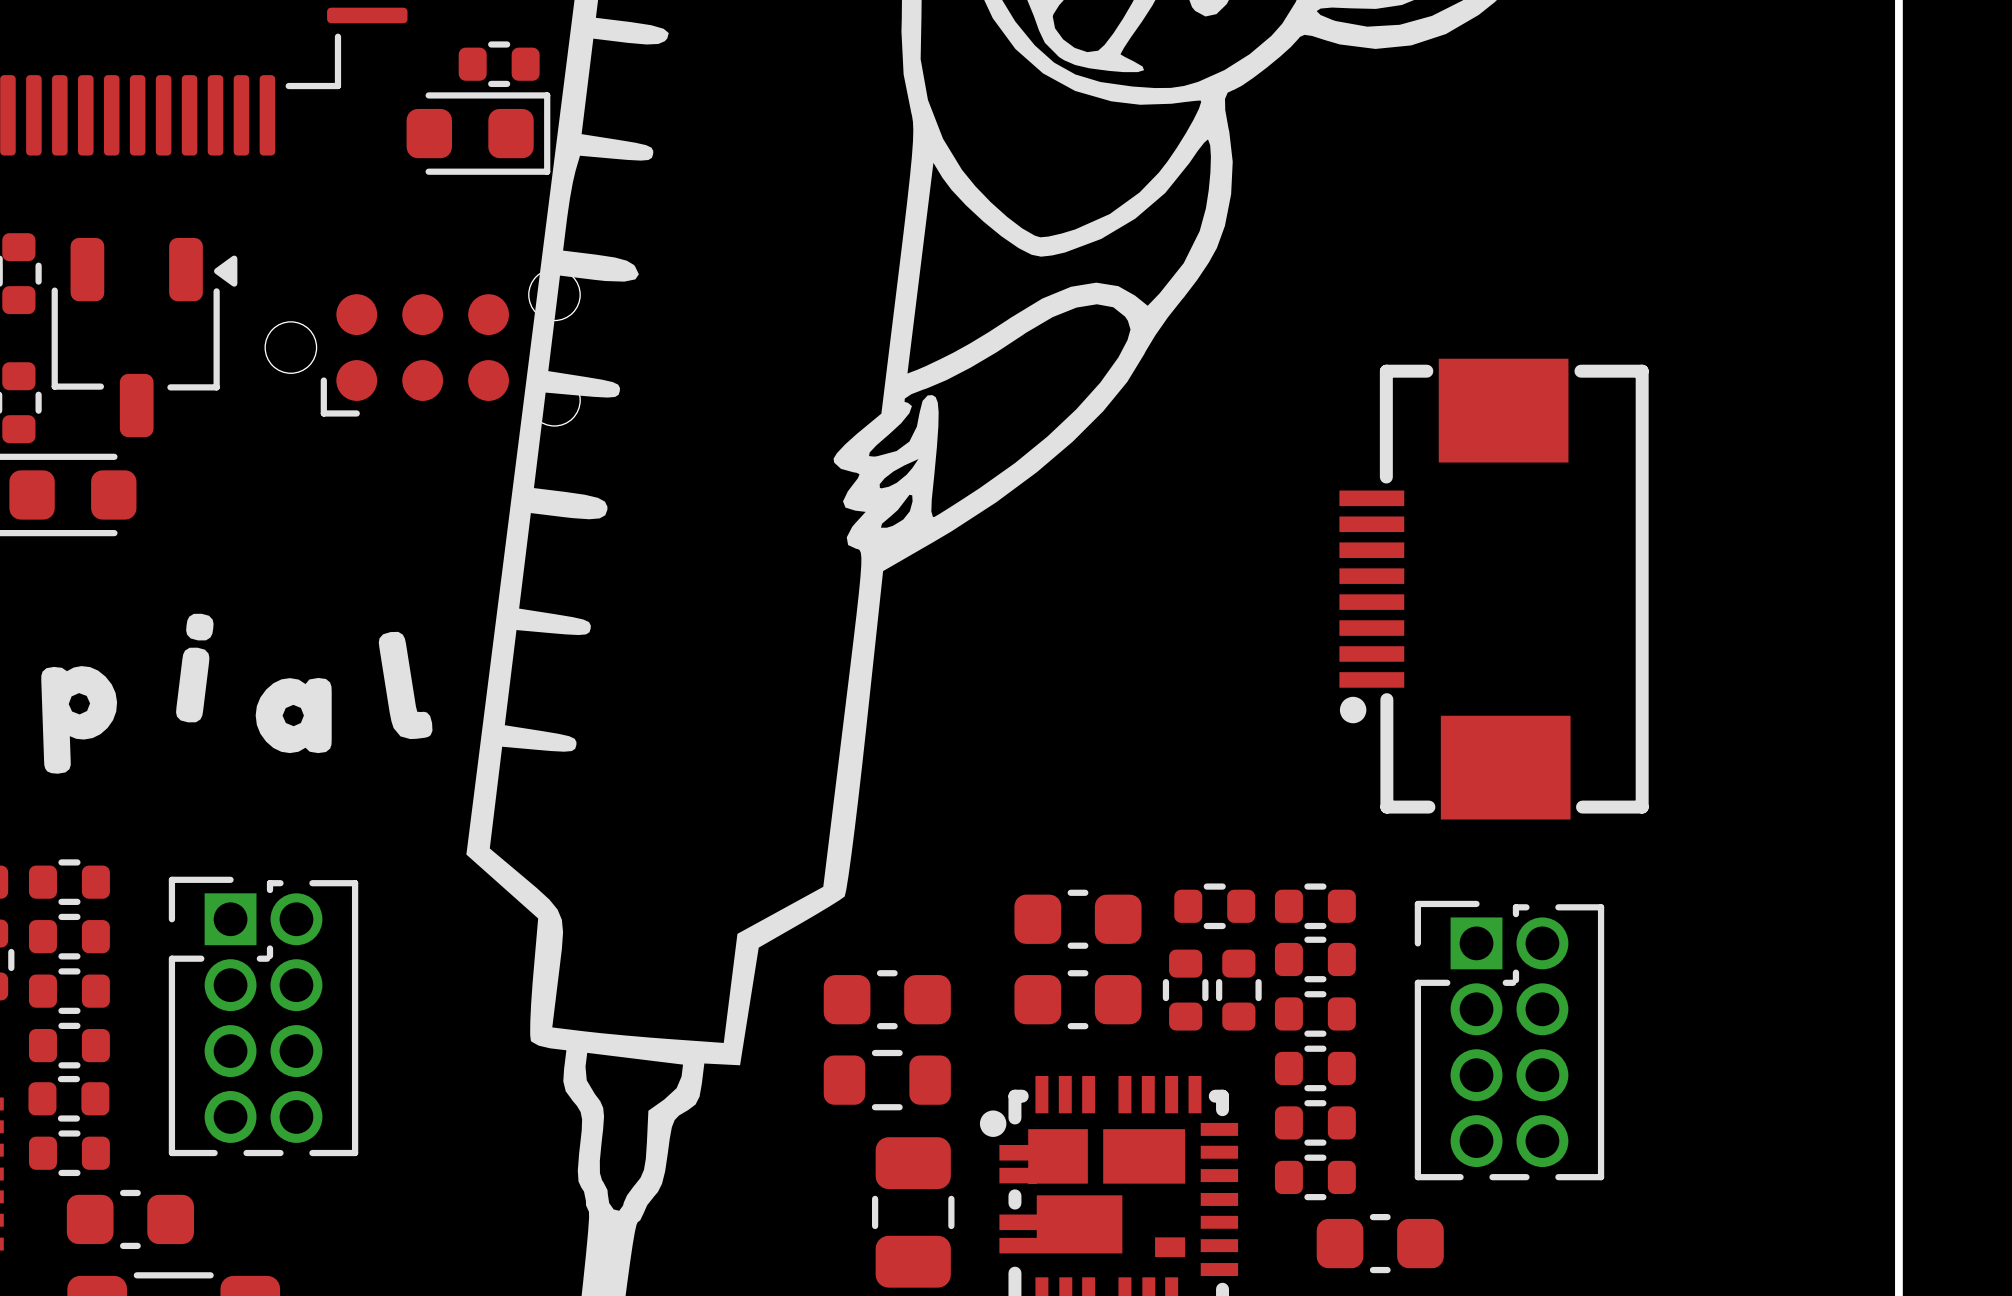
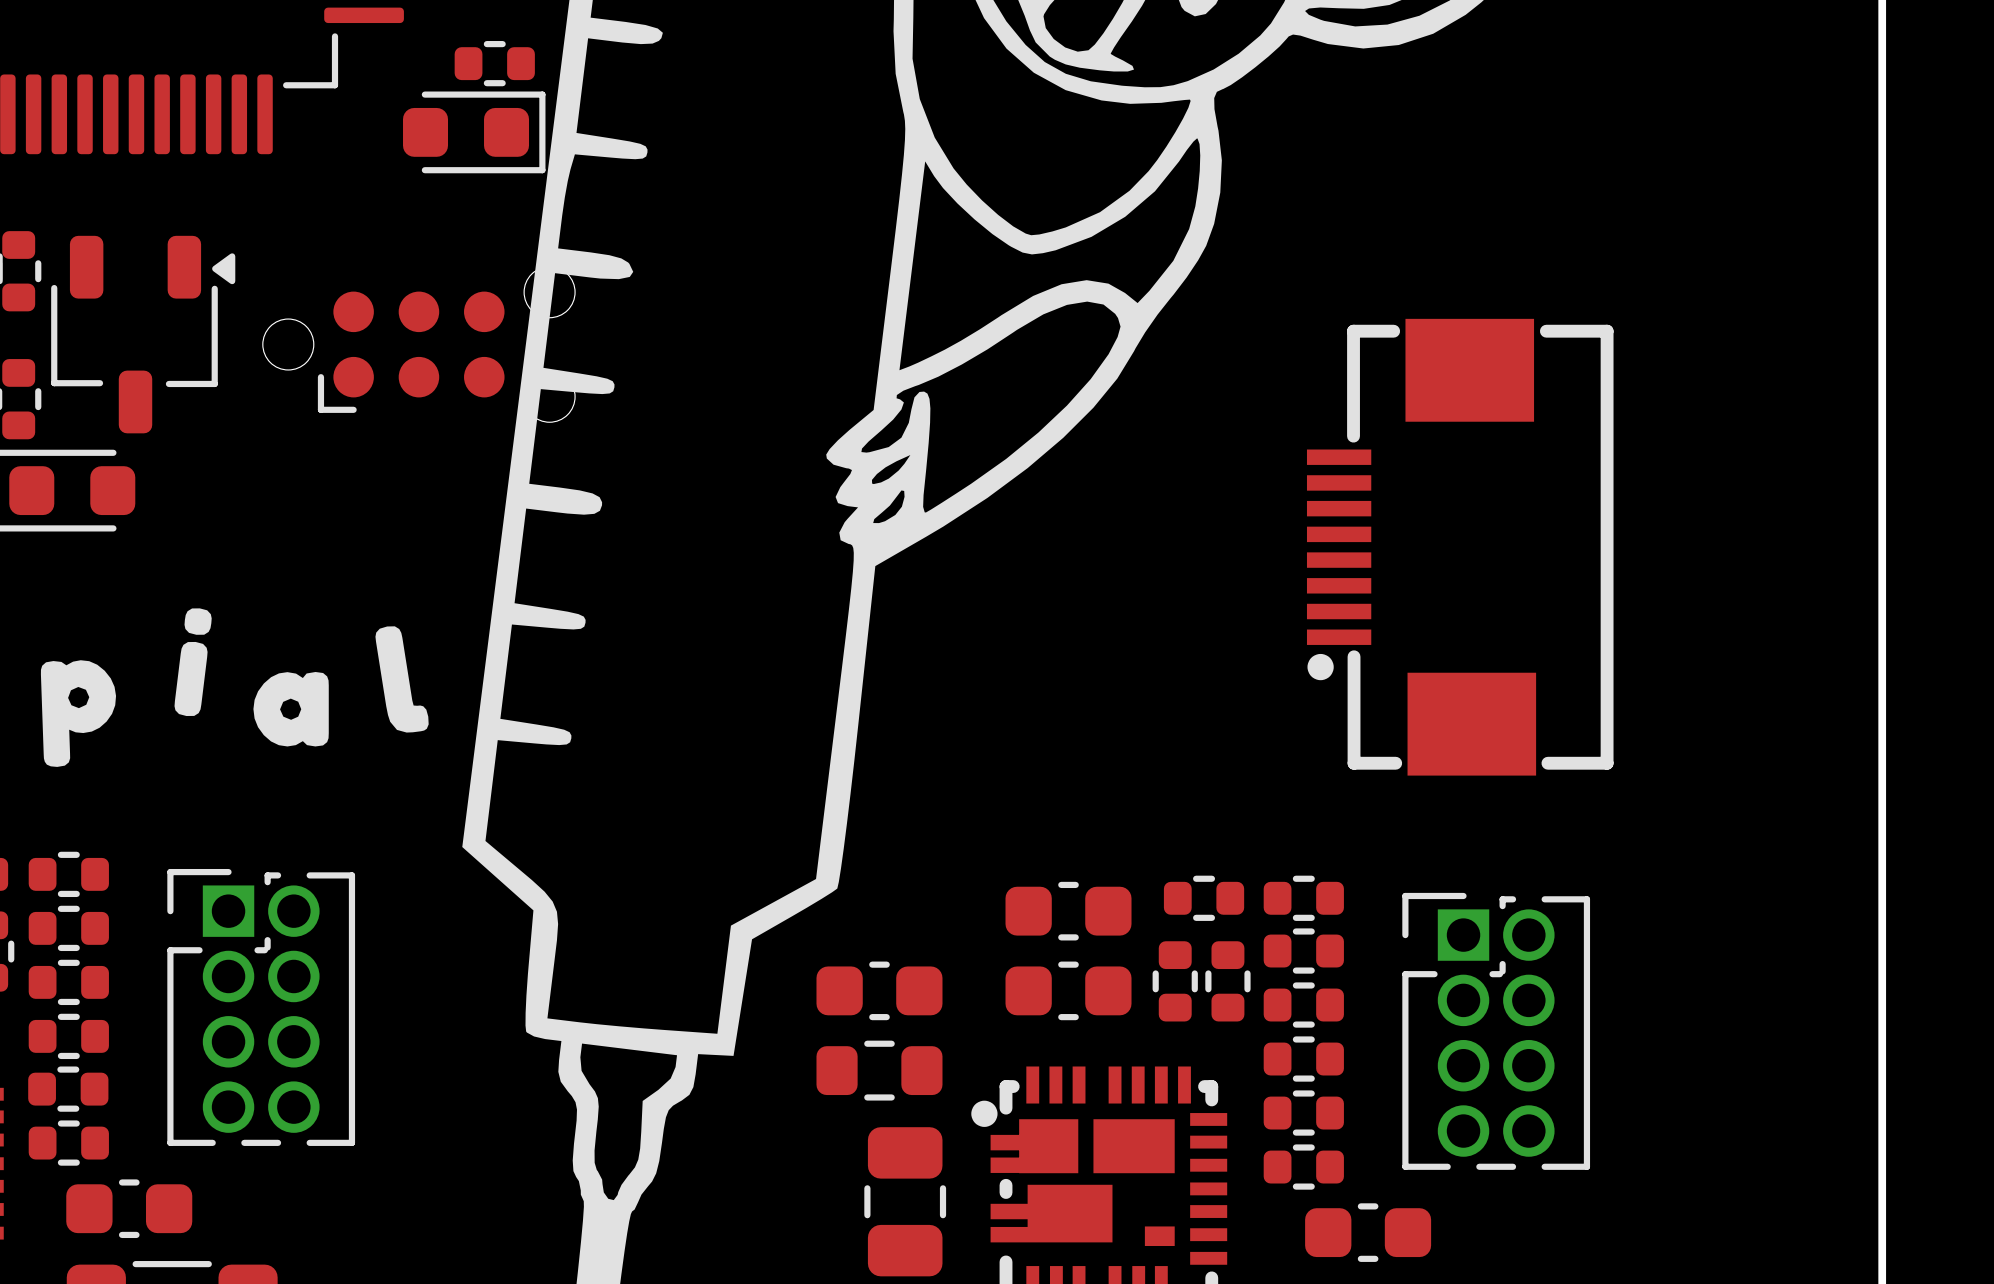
part position: (1494, 589) -> (1460, 547)

